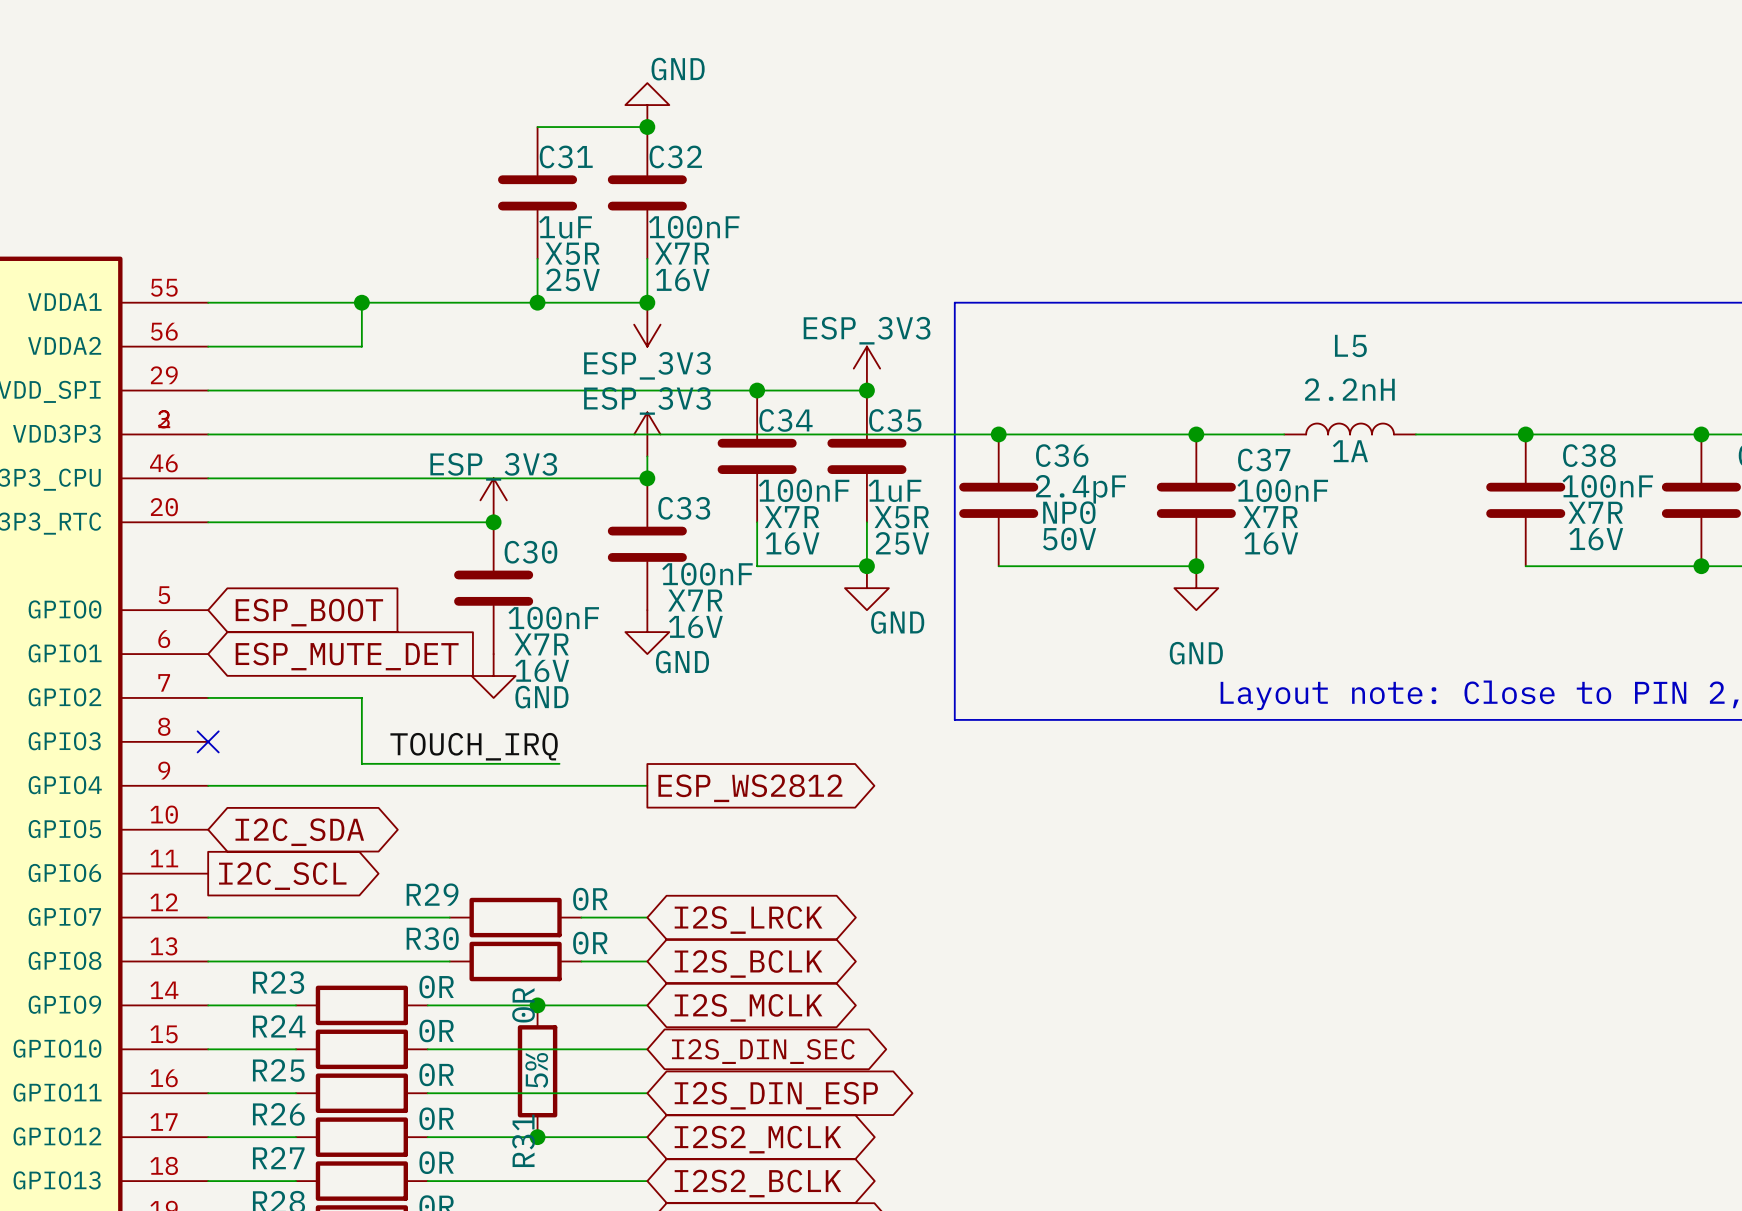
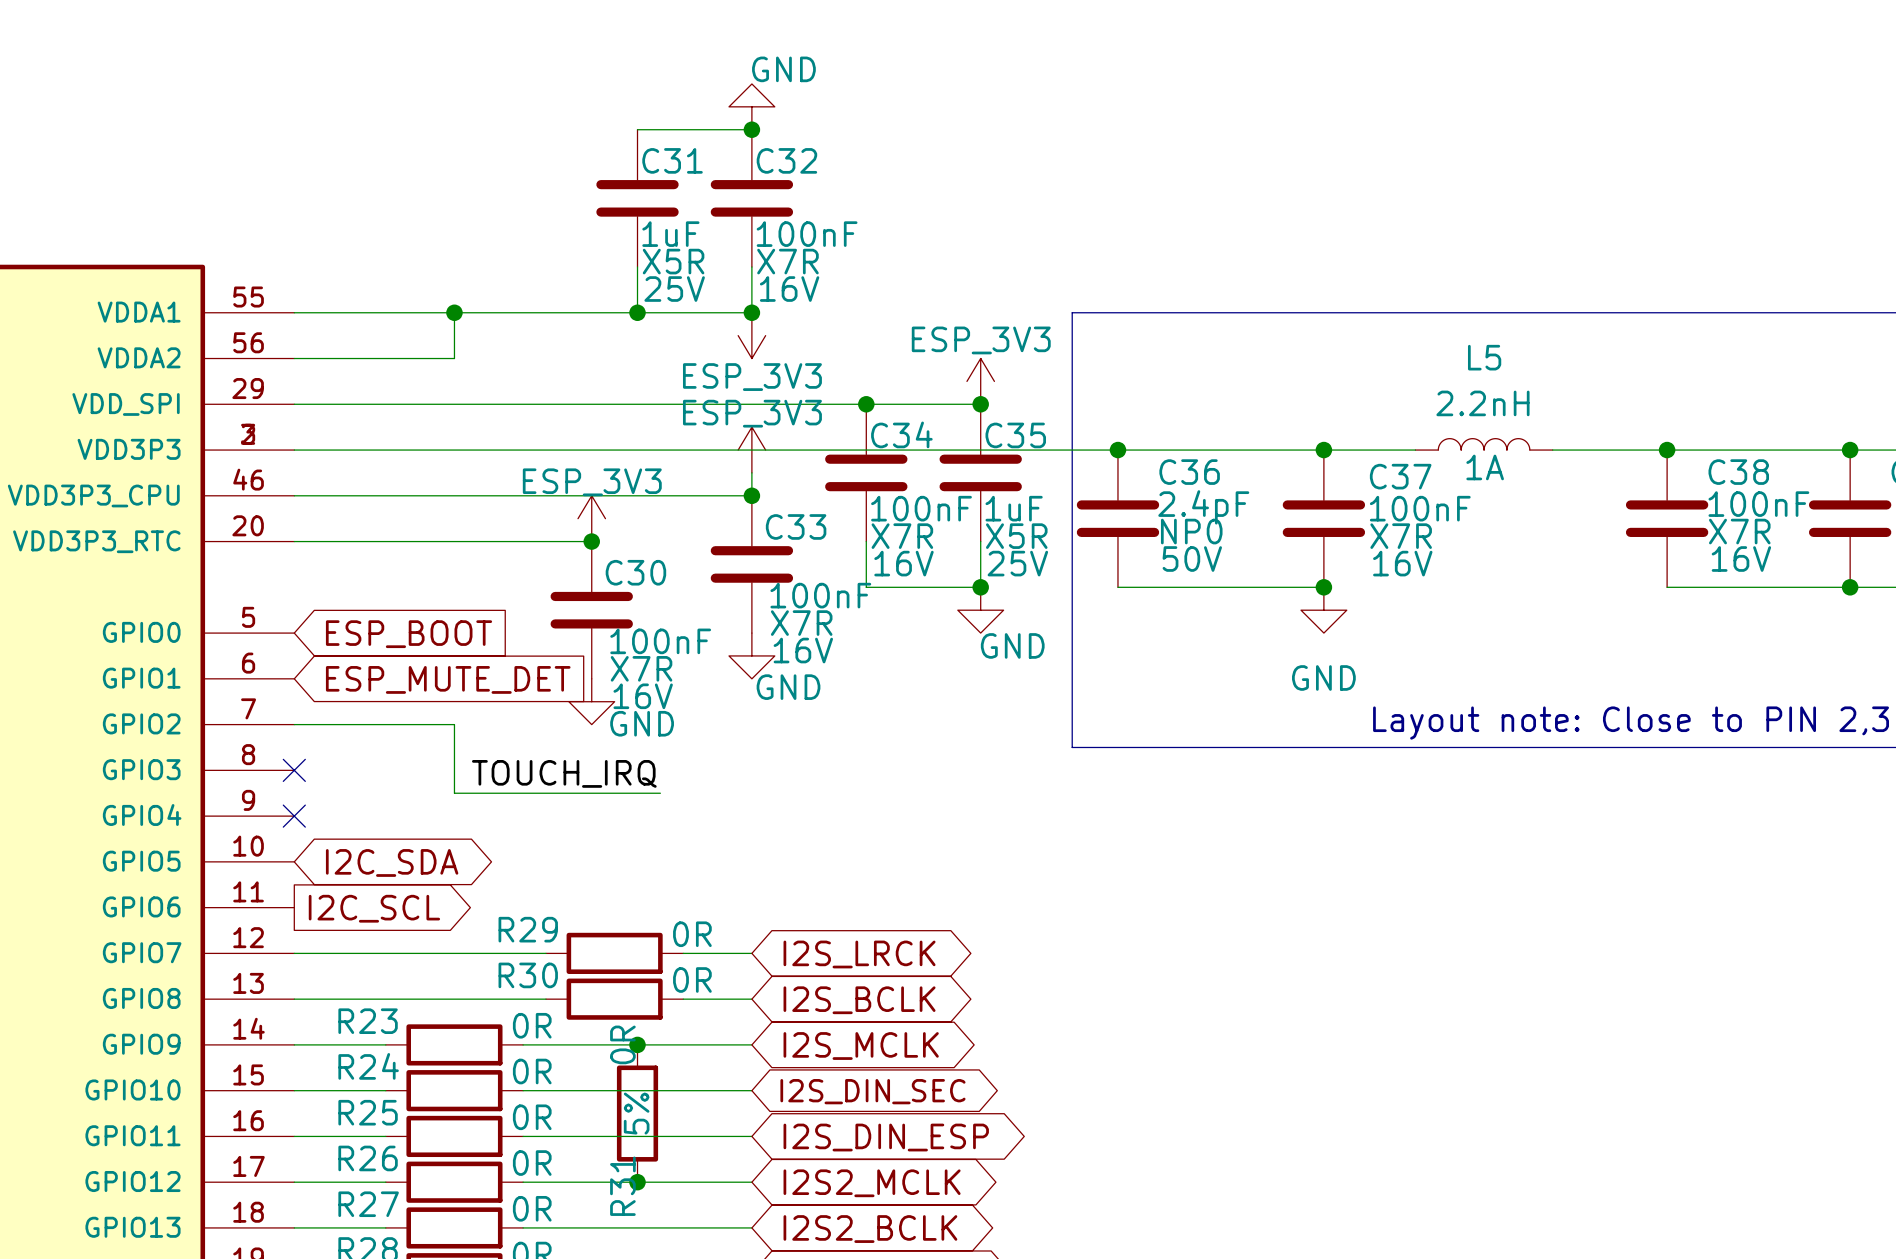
wire: (208, 785) (647, 785) -> none
no-connect mark: none -> (294, 816)
global label: ESP_WS2812 (750, 788) -> none

